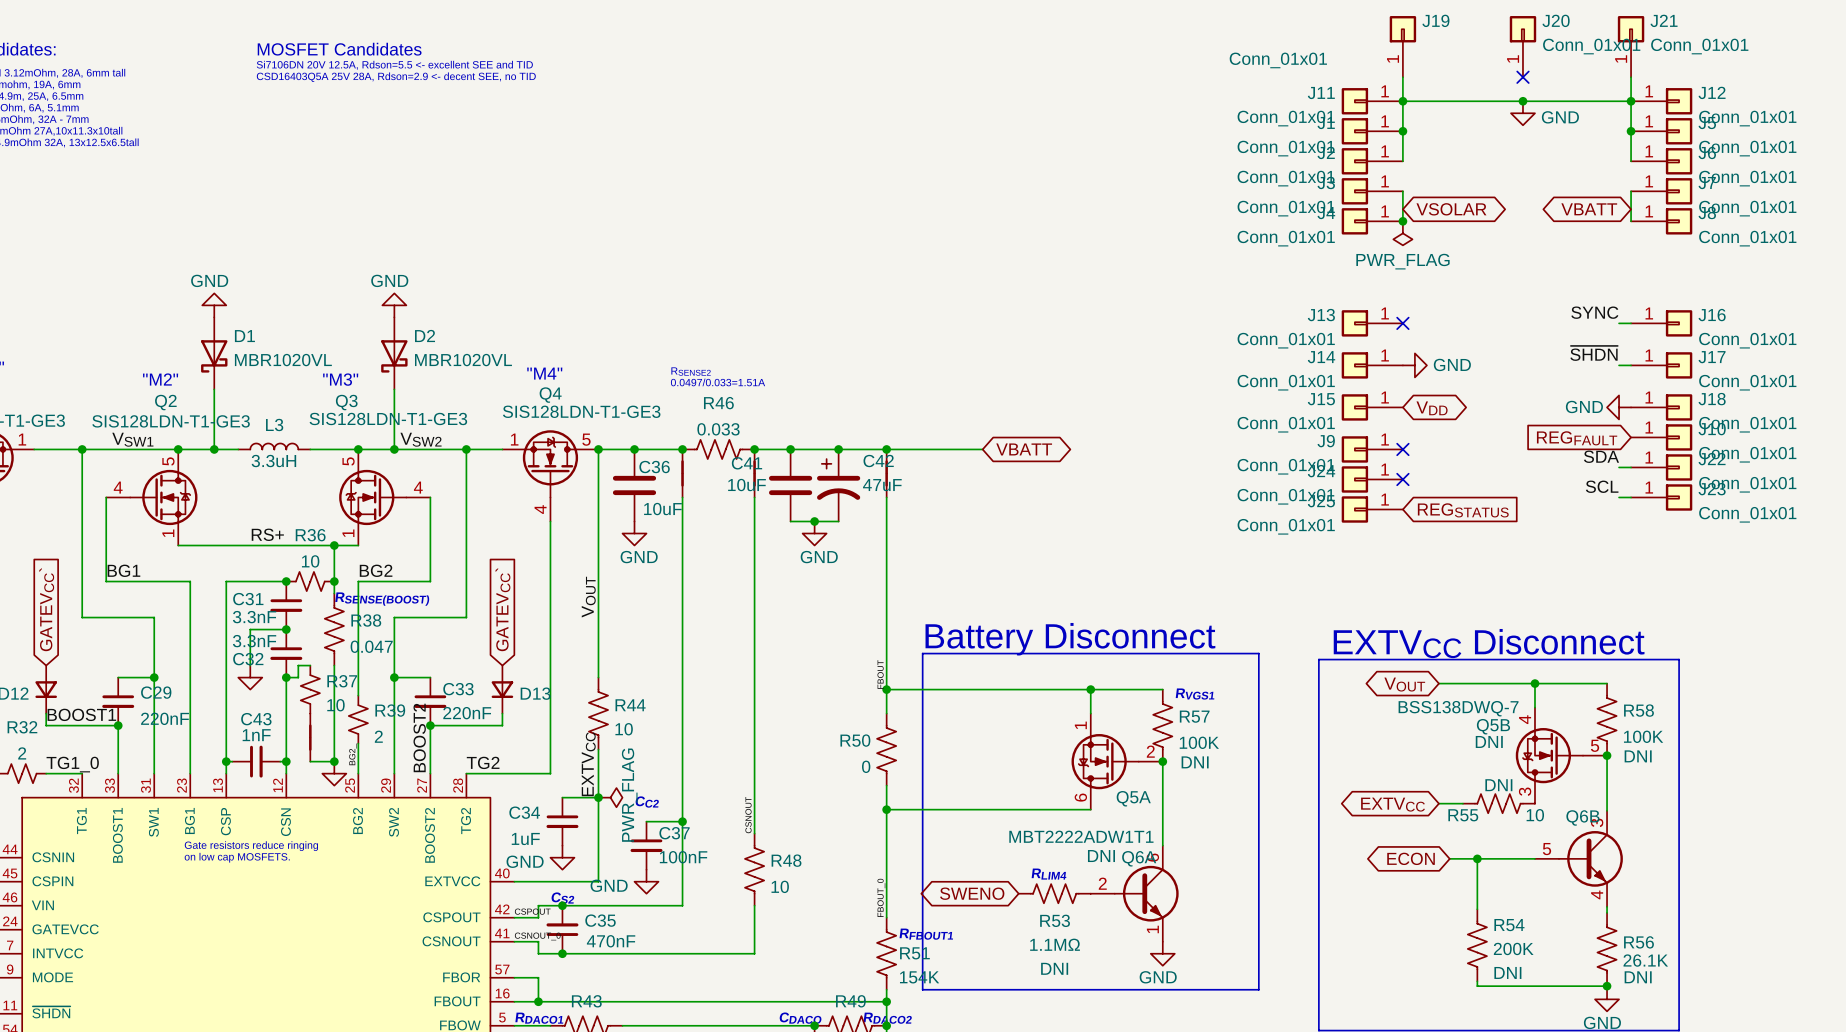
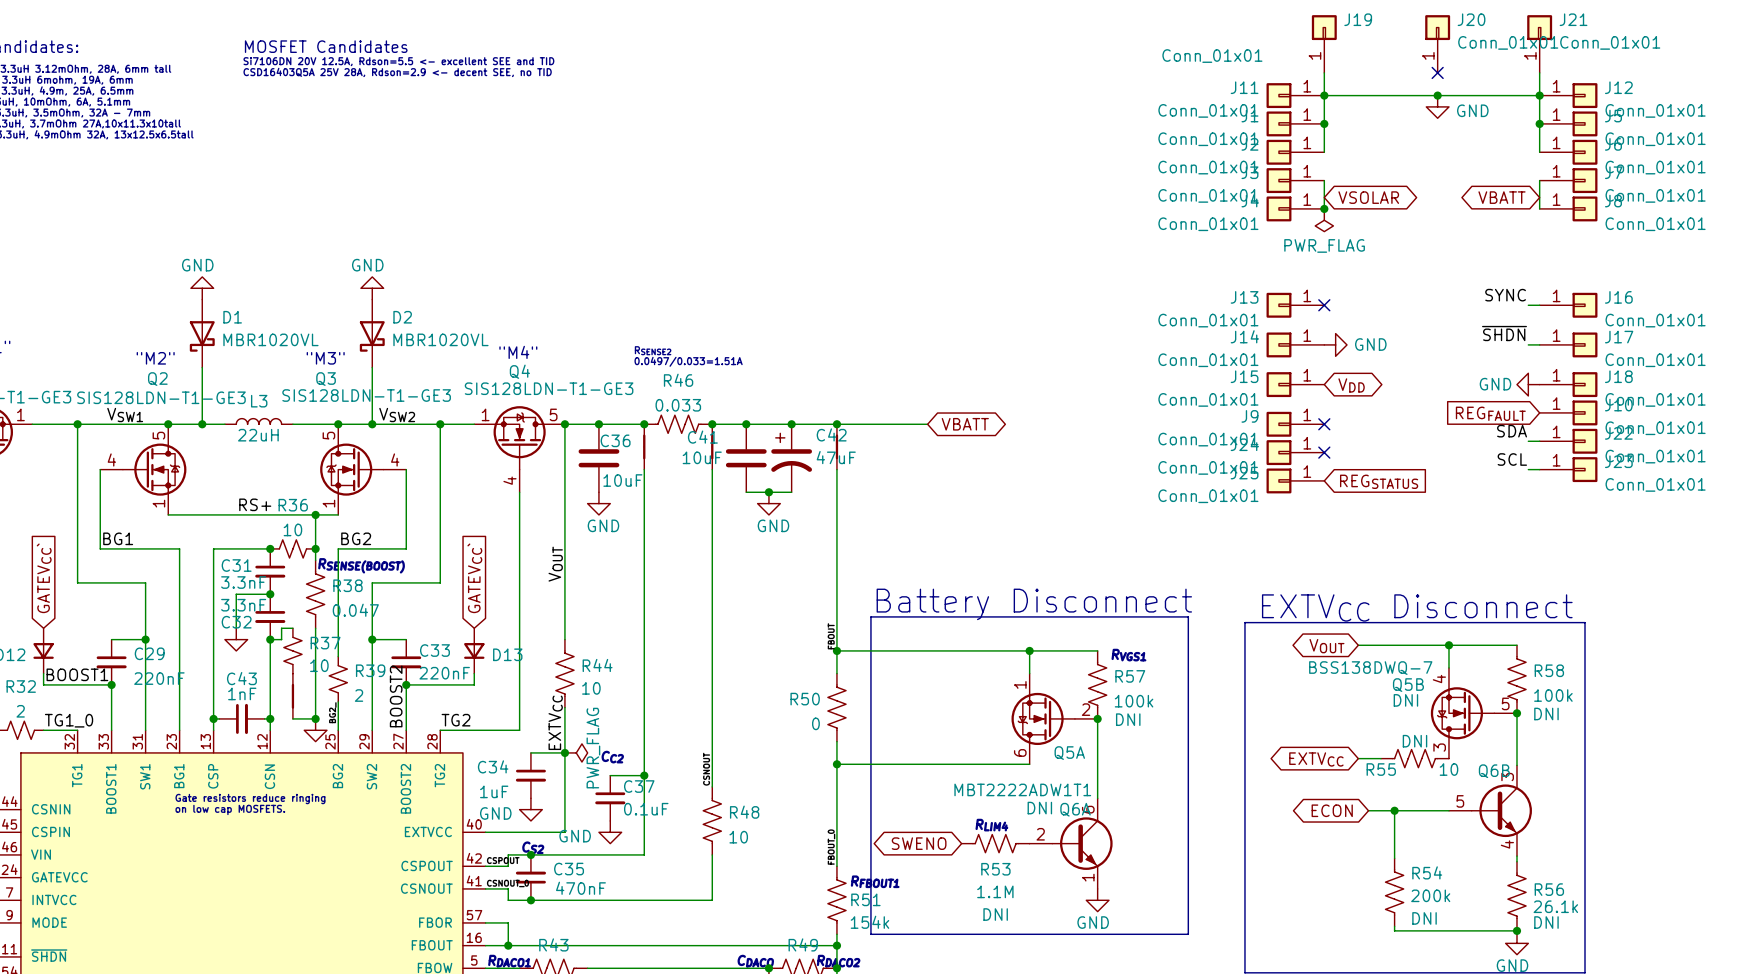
L3 value: 3.3uH (273, 461) -> 22uH (258, 435)
R58 value: 100K (1643, 736) -> 100k (1553, 695)
R57 value: 100K (1199, 742) -> 100k (1134, 701)
C37 value: 100nF (683, 857) -> 0.1uF (646, 809)
R53 value: 1.1MΩ (1055, 944) -> 1.1M (995, 891)
R54 value: 200K (1513, 948) -> 200k (1430, 895)
R56 value: 26.1K (1645, 960) -> 26.1k (1555, 906)
R51 value: 154K (919, 977) -> 154k (869, 922)

